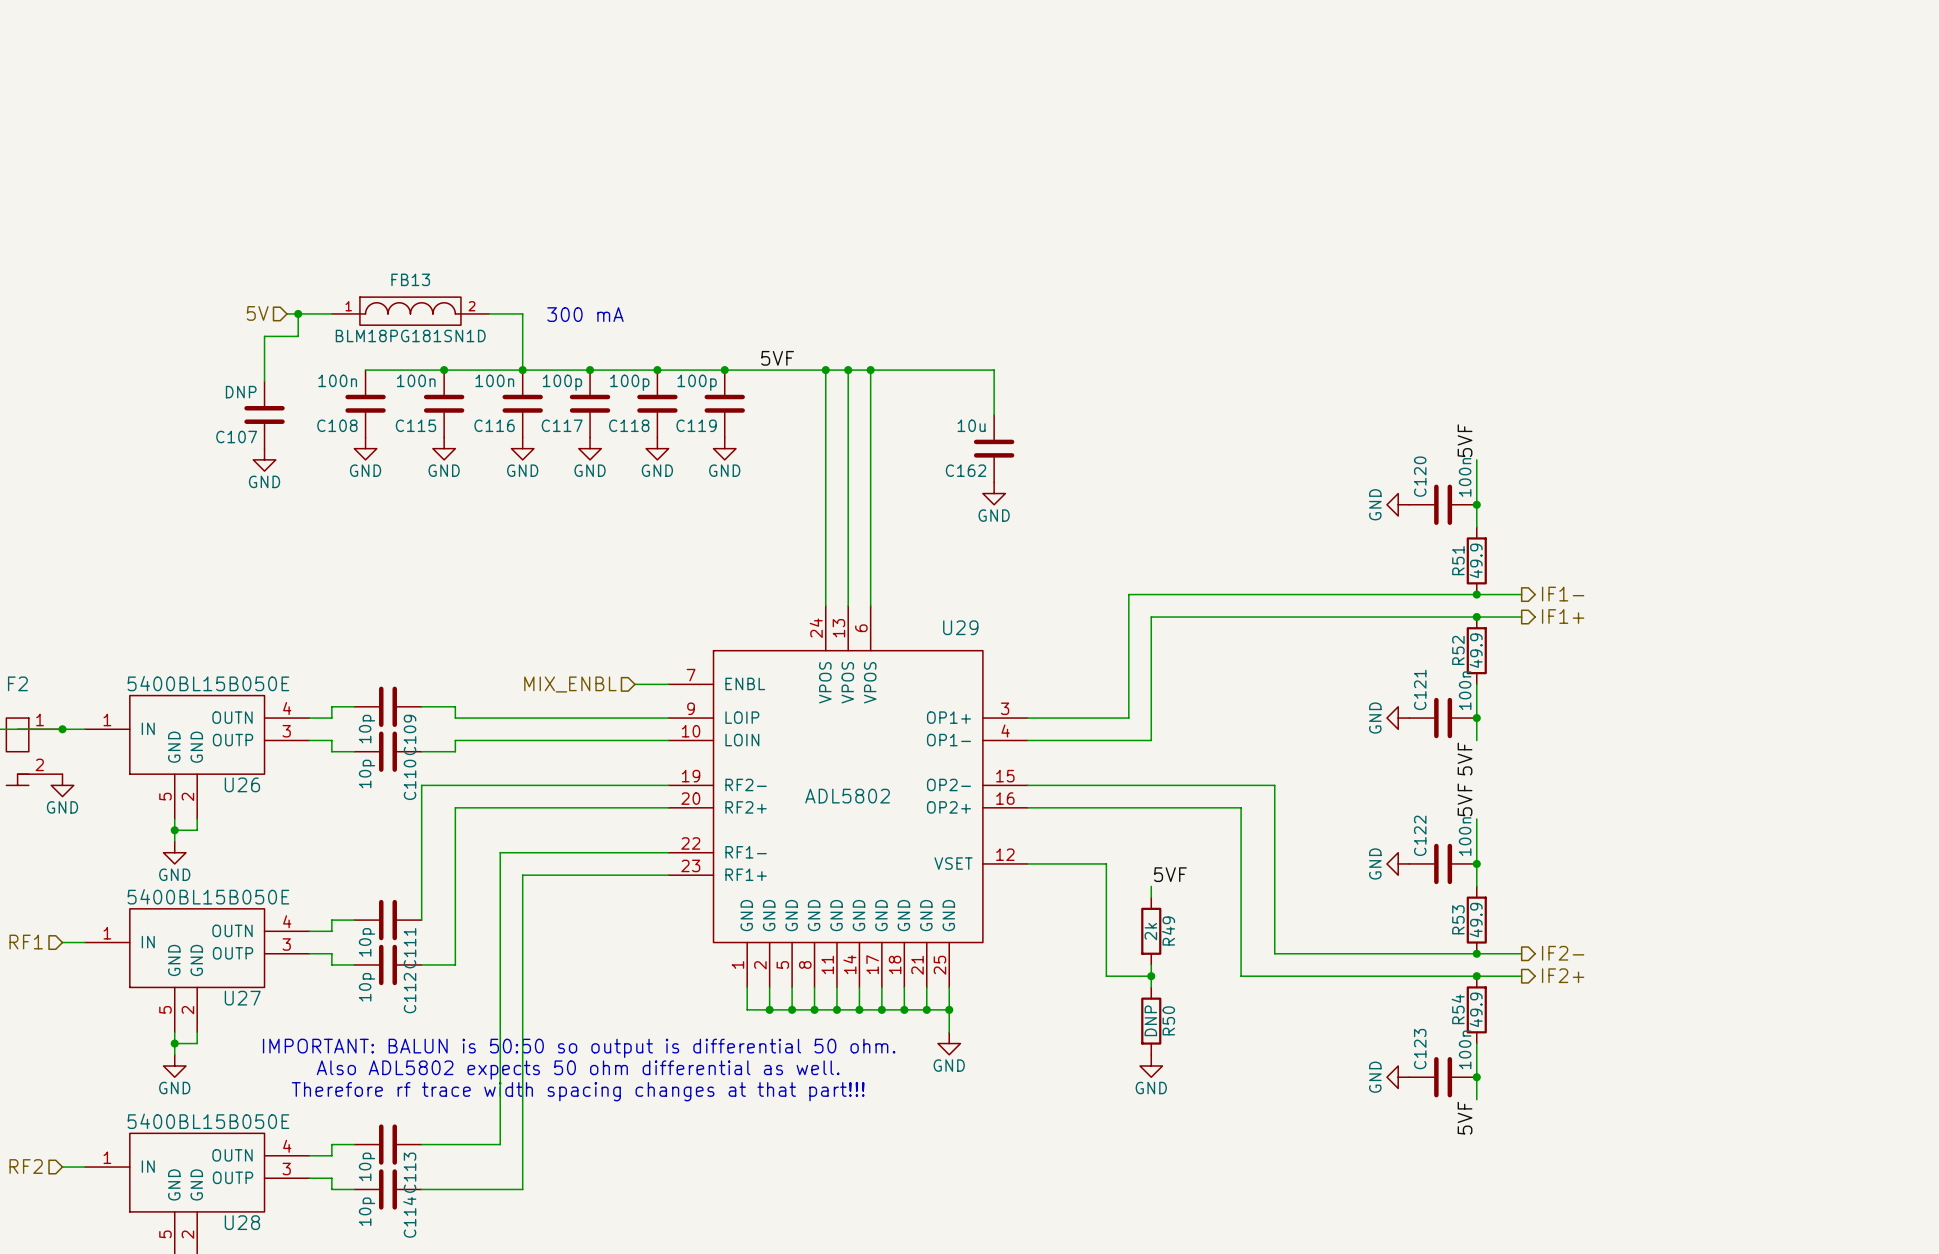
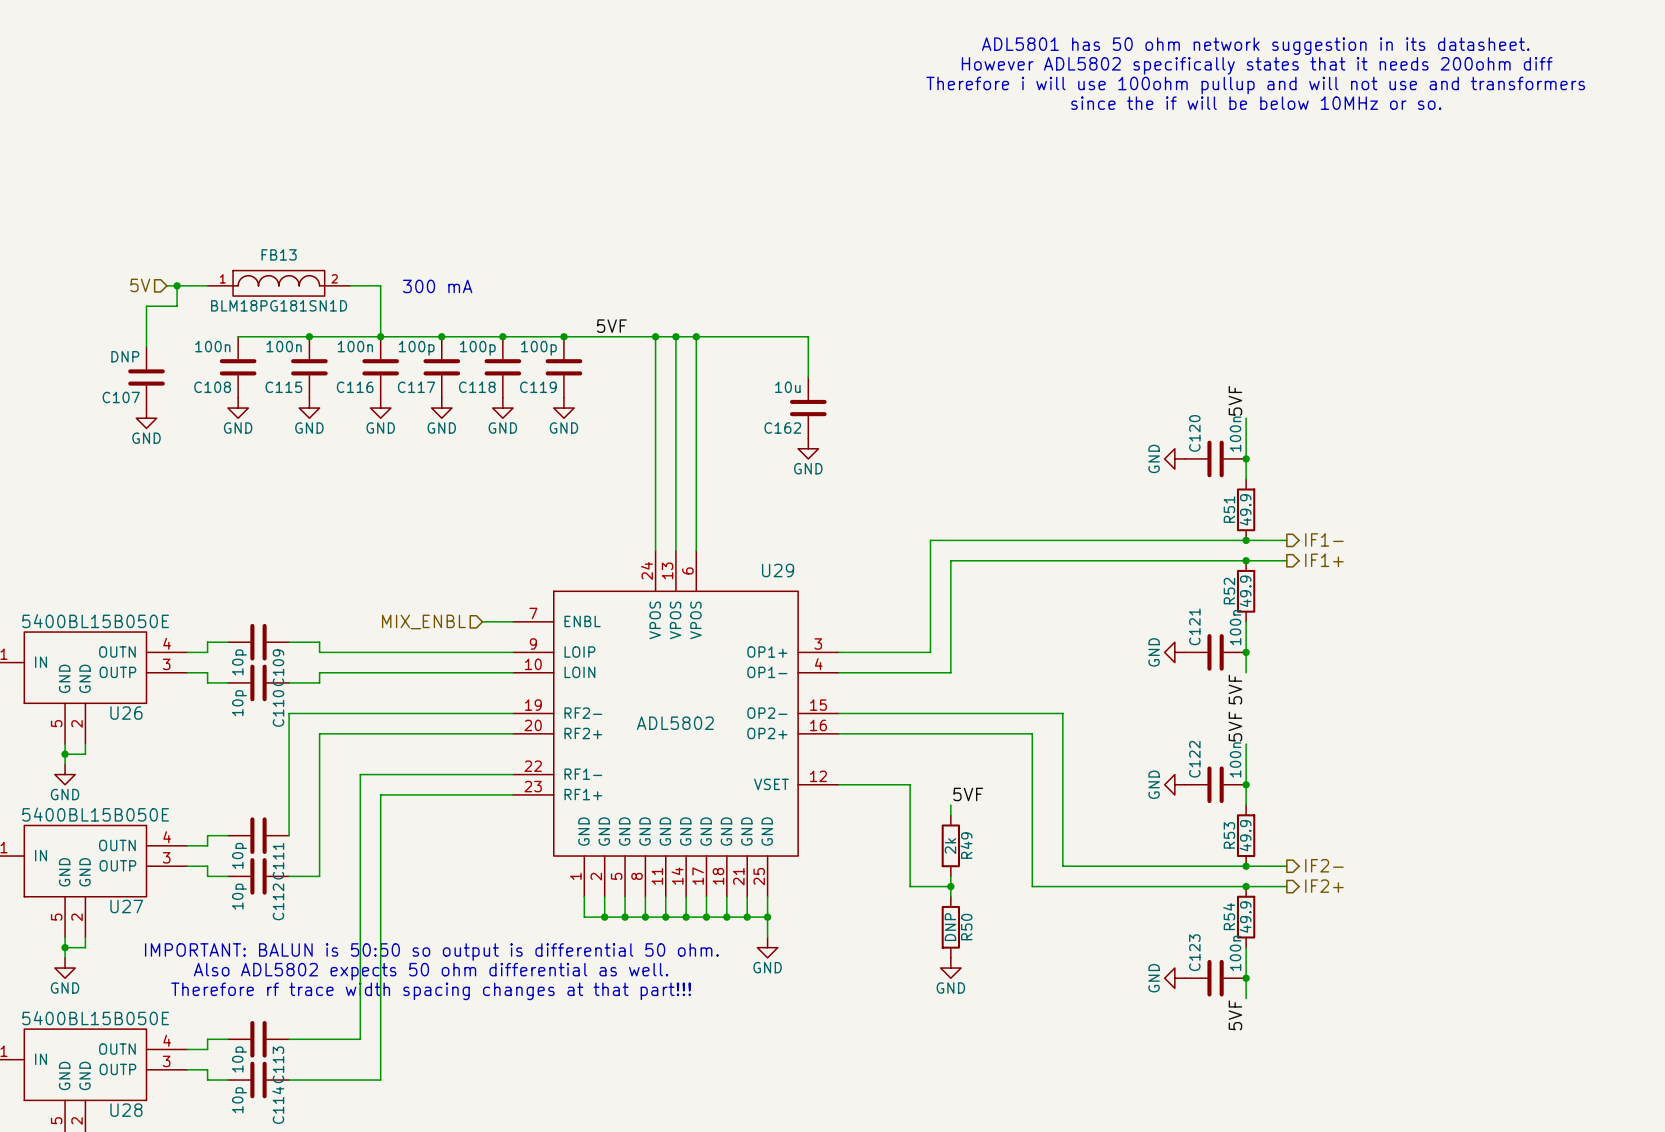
text: none -> ADL5801 has 50 ohm network suggestion in its datasheet. (1255, 46)
text: none -> However ADL5802 specifically states that it needs 200ohm diff (1257, 65)
text: none -> Therefore i will use 100ohm pullup and will not use and transformers (1255, 85)
text: none -> since the if will be below 10MHz or so. (1256, 103)

